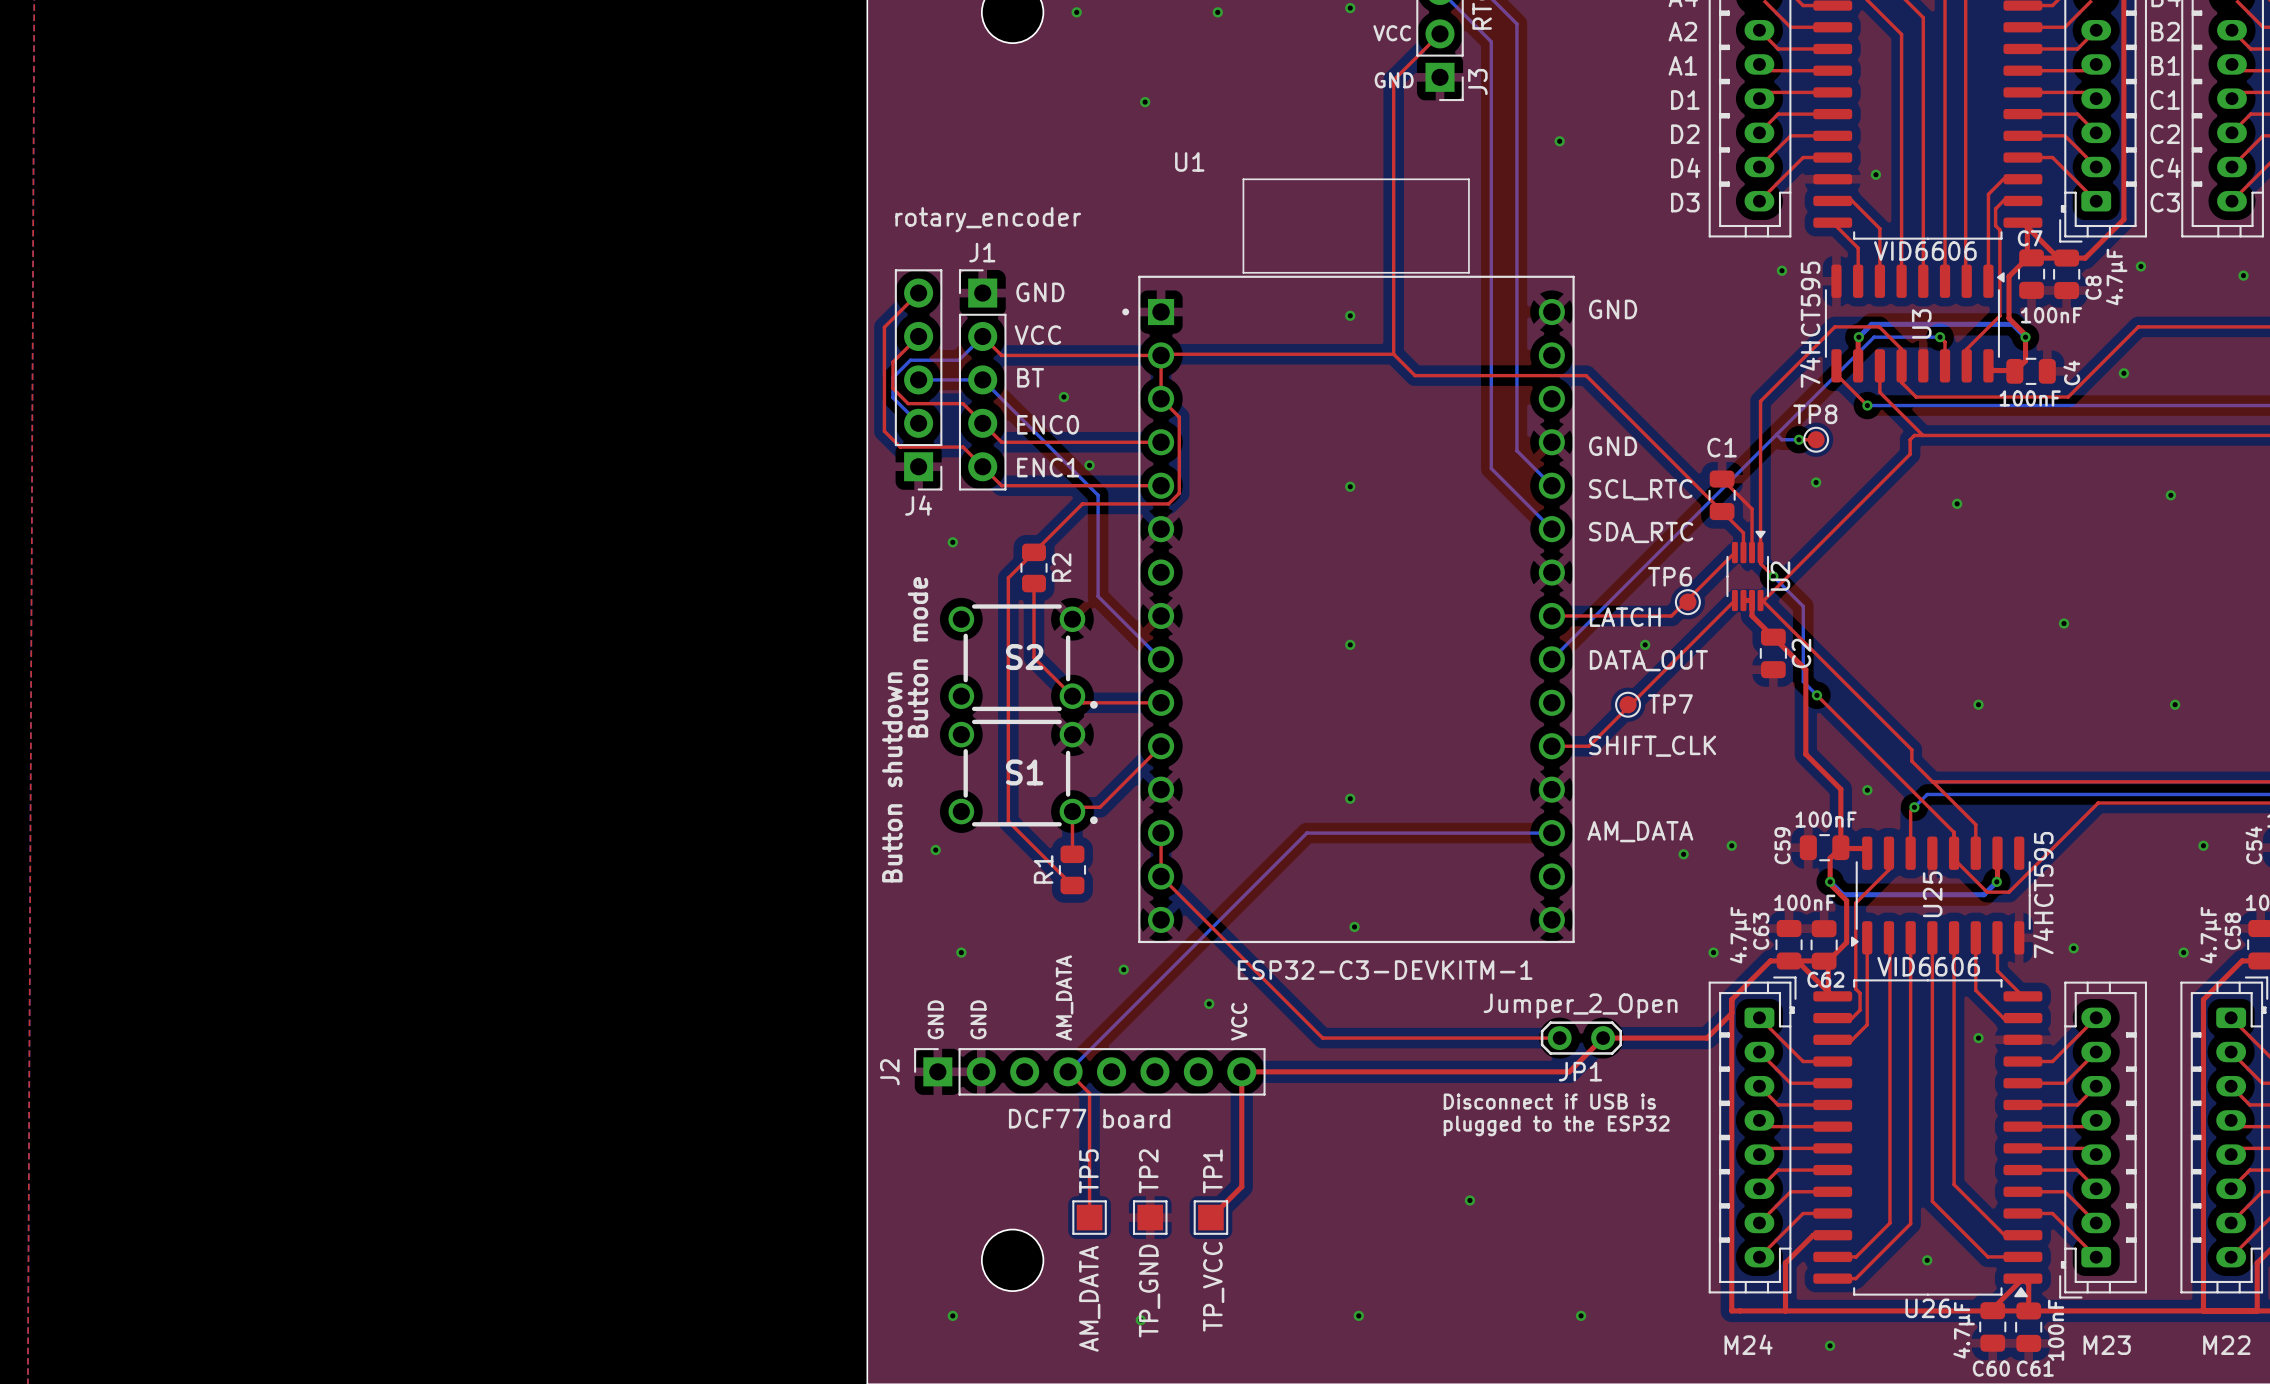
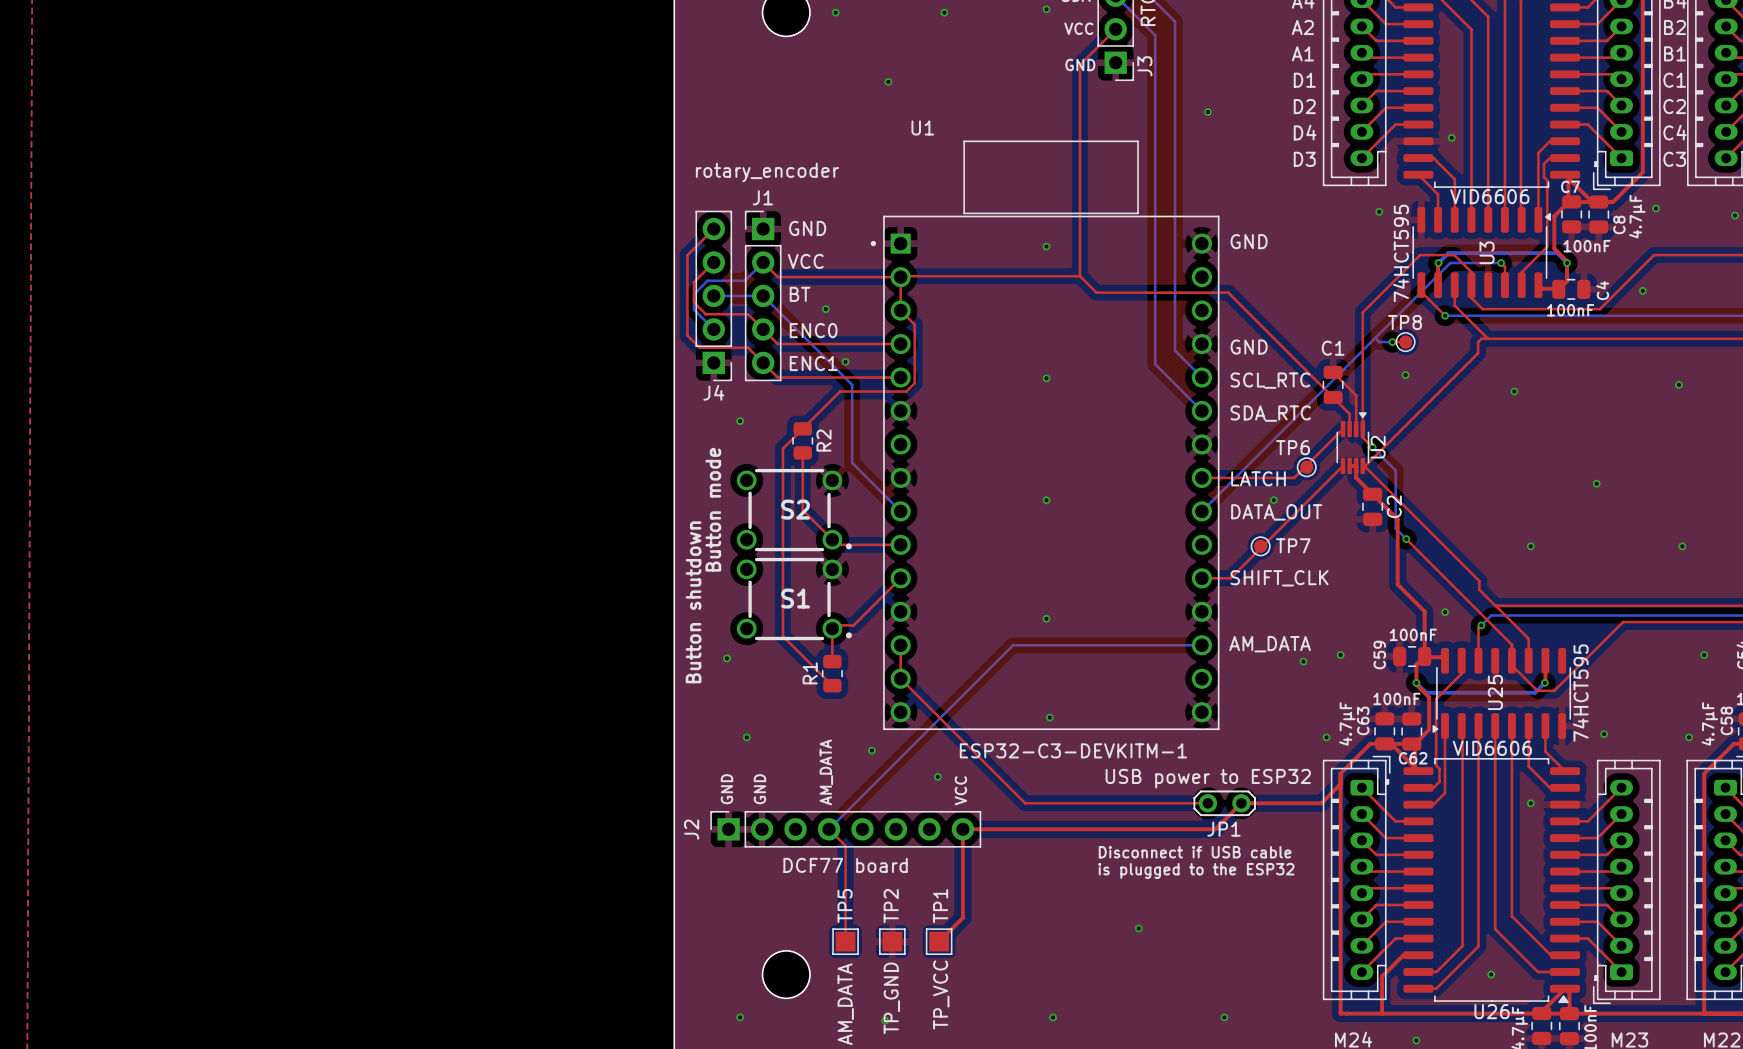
JP1 value: Jumper_2_Open (1580, 1006) -> USB power to ESP32 (1208, 778)
text: Disconnect if USB is (1549, 1101) -> Disconnect if USB cable (1195, 852)
text: plugged to the ESP32 (1556, 1125) -> is plugged to the ESP32 (1196, 870)

